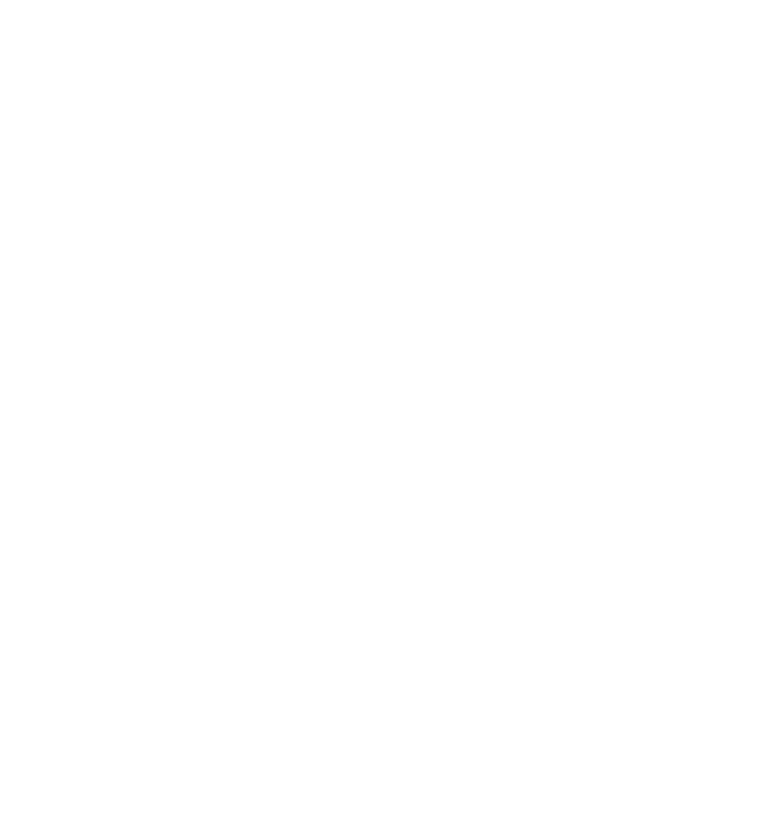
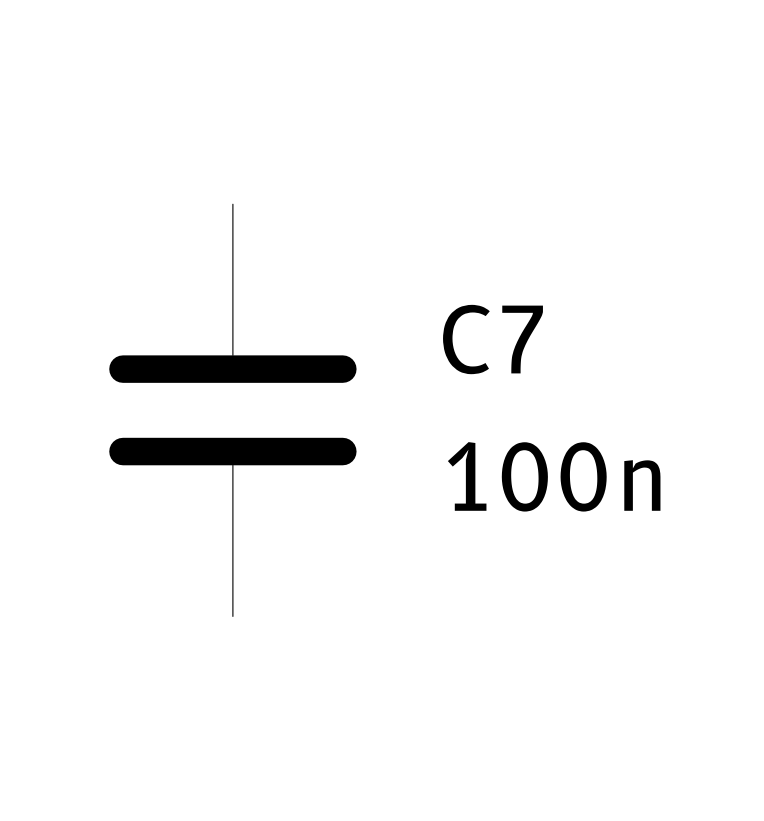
C7: none -> 100n (232, 410)

